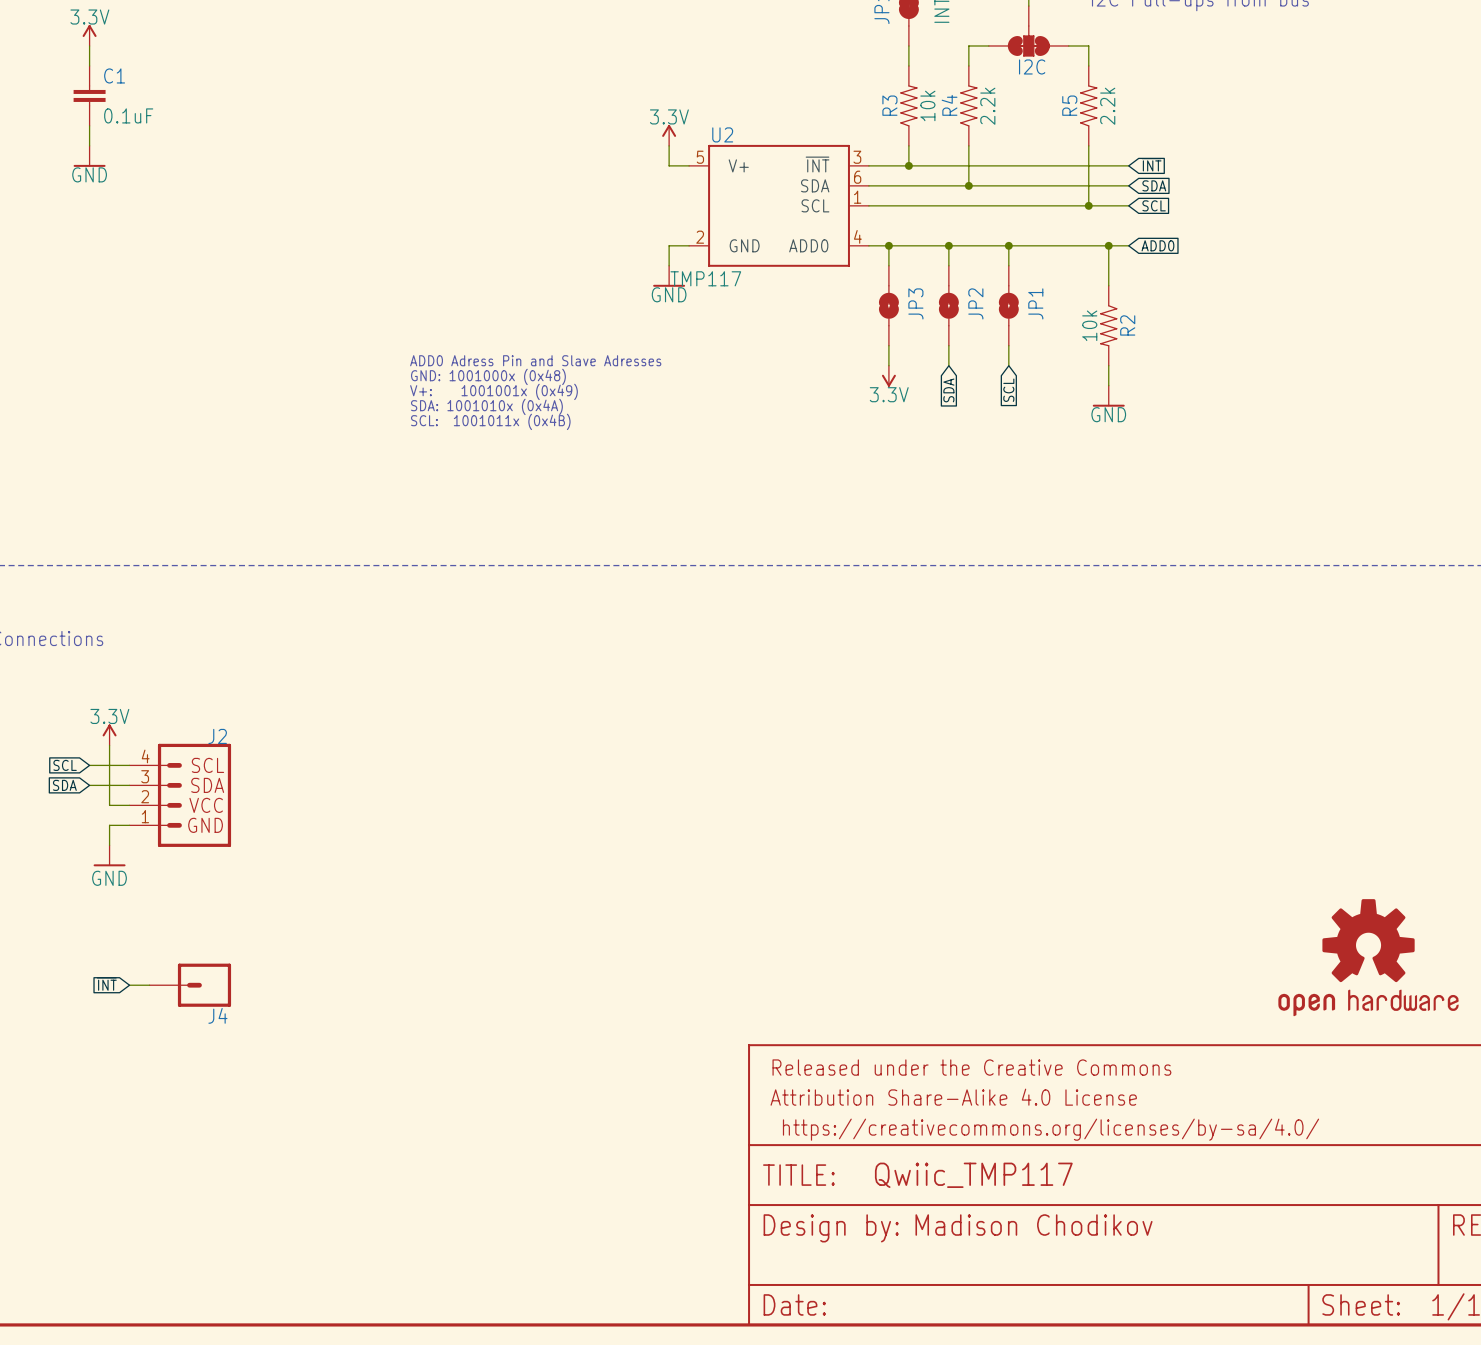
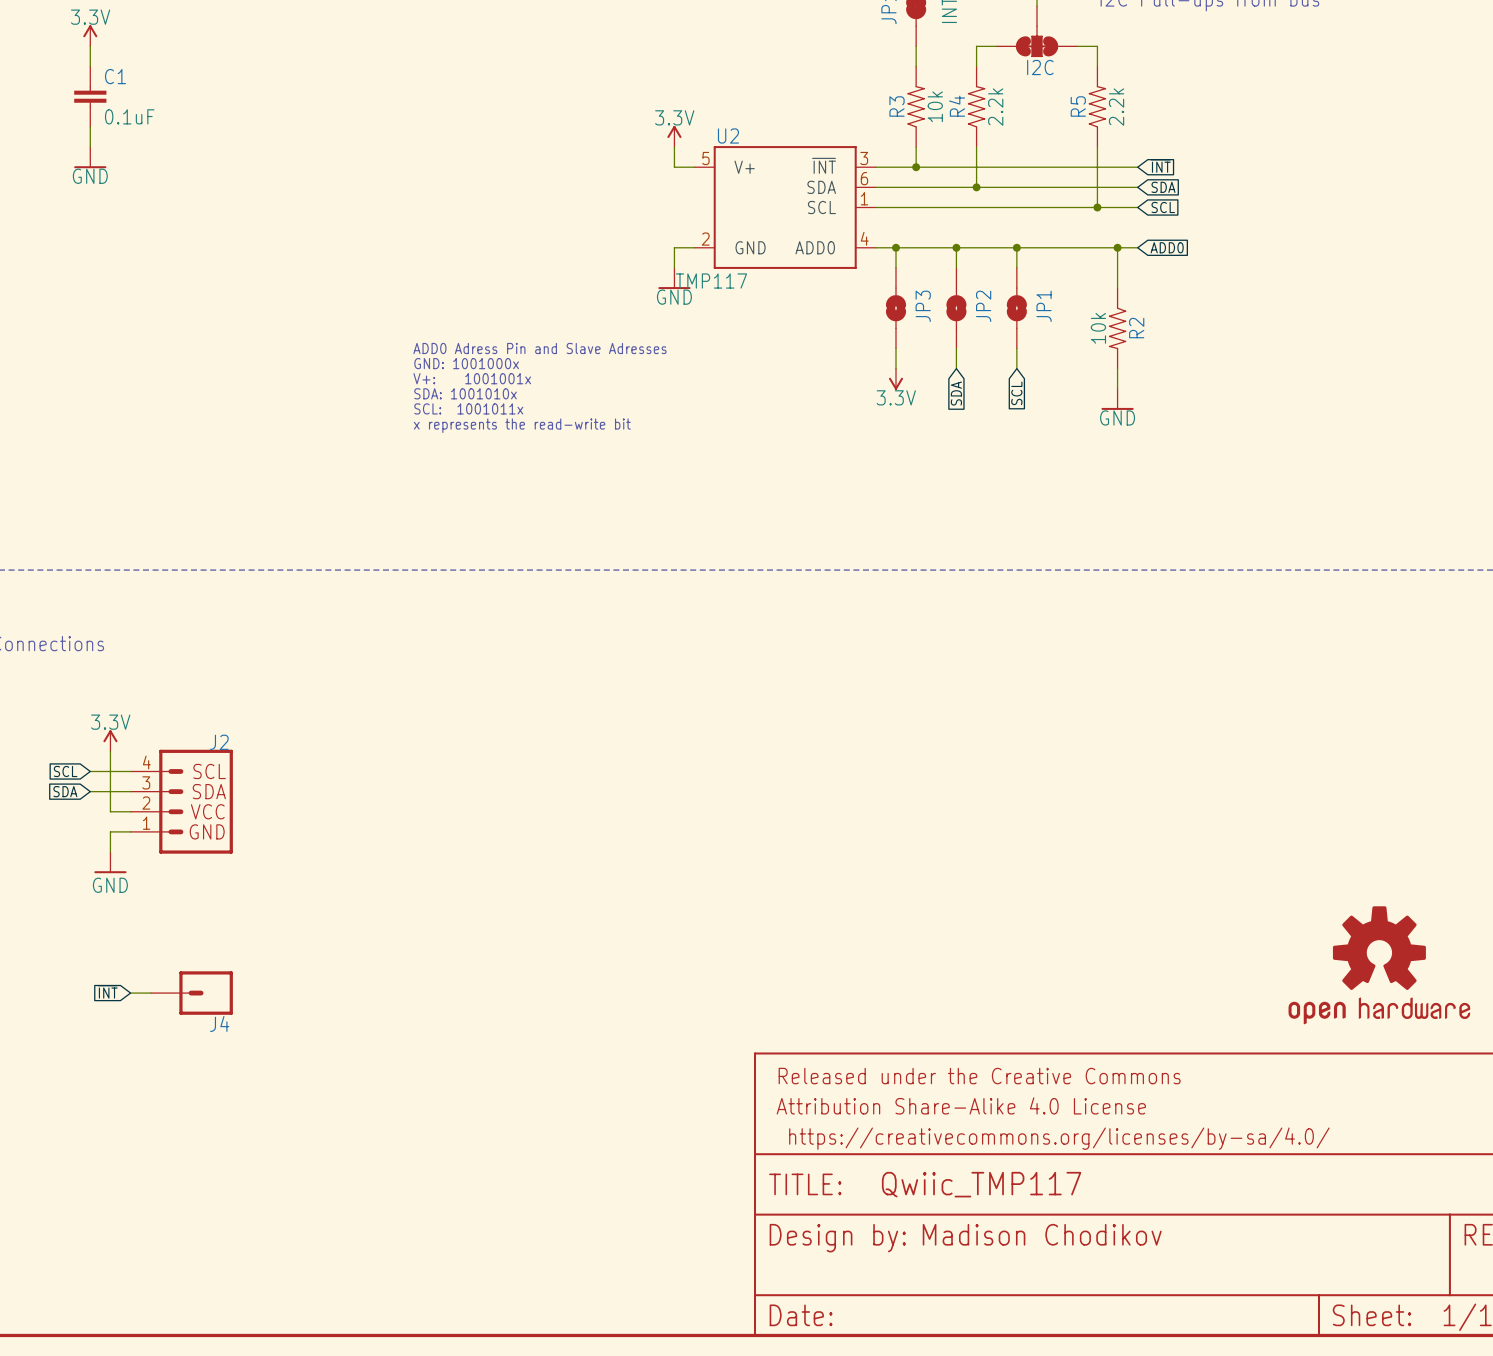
text: none -> ADD0 Adress Pin and Slave Adresses (540, 348)
text: ADD0 Adress Pin and Slave Adresses (535, 360) -> GND: 1001000x (466, 363)
text: GND: 1001000x (0x48) (488, 376) -> V+: 1001001x (472, 378)
text: V+: 1001001x (0x49) (493, 391) -> SDA: 1001010x (465, 393)
text: SDA: 1001010x (0x4A) (486, 406) -> SCL: 1001011x (468, 408)
text: SCL: 1001011x (0x4B) (490, 421) -> x represents the read-write bit (522, 425)

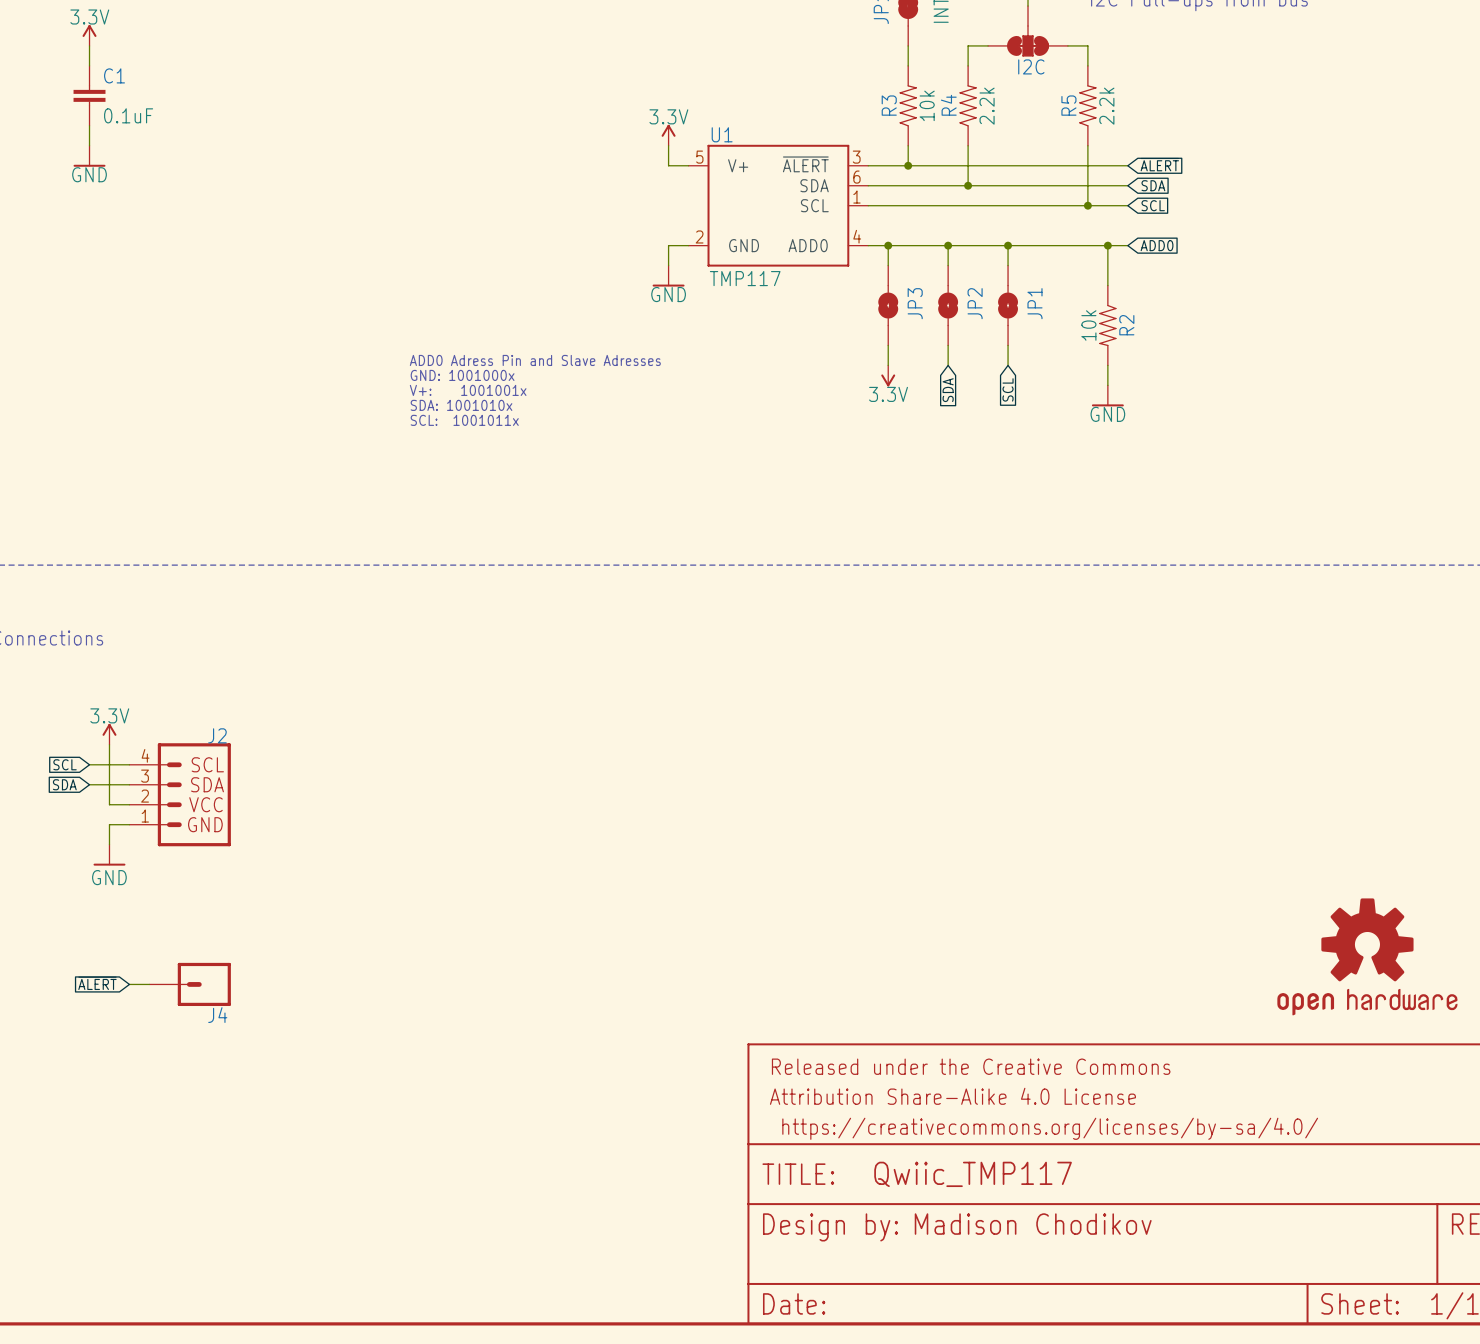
U2 name: U2 (728, 135) -> U1 (722, 134)
U2 pin name: ~{INT} (824, 165) -> ~{ALERT} (805, 164)
global label: ~{INT} (1160, 166) -> ~{ALERT} (1159, 164)
U2 value position: TMP117 (711, 281) -> TMP117 (745, 278)
text: ADD0 Adress Pin and Slave Adresses (540, 348) -> none
text: GND: 1001000x (466, 363) -> ADD0 Adress Pin and Slave Adresses (535, 360)
text: V+: 1001001x (472, 378) -> GND: 1001000x (462, 375)
text: SDA: 1001010x (465, 393) -> V+: 1001001x (468, 390)
text: SCL: 1001011x (468, 408) -> SDA: 1001010x (461, 405)
text: x represents the read-write bit (522, 425) -> SCL: 1001011x (464, 420)
global label: ~{INT} (107, 991) -> ~{ALERT} (97, 983)

